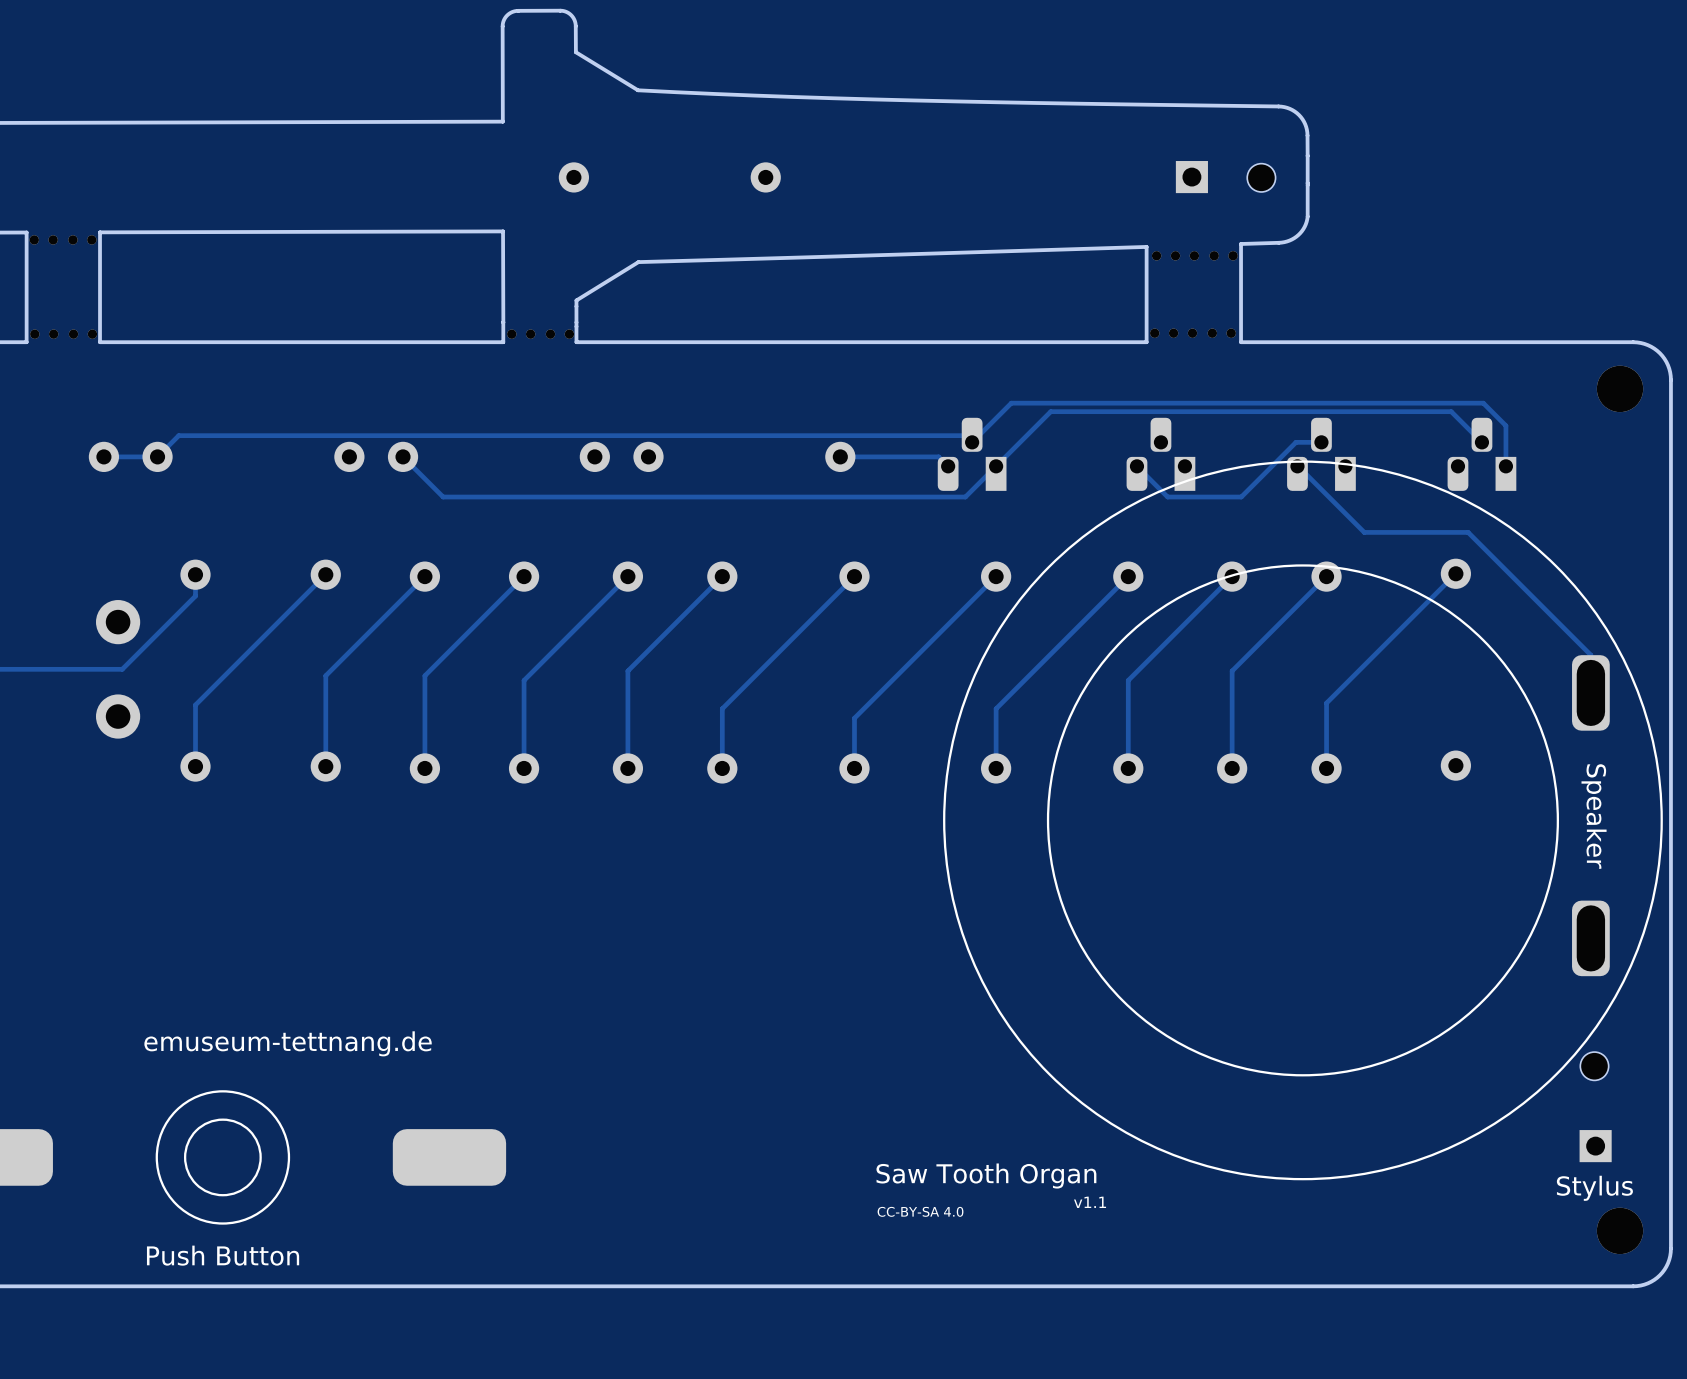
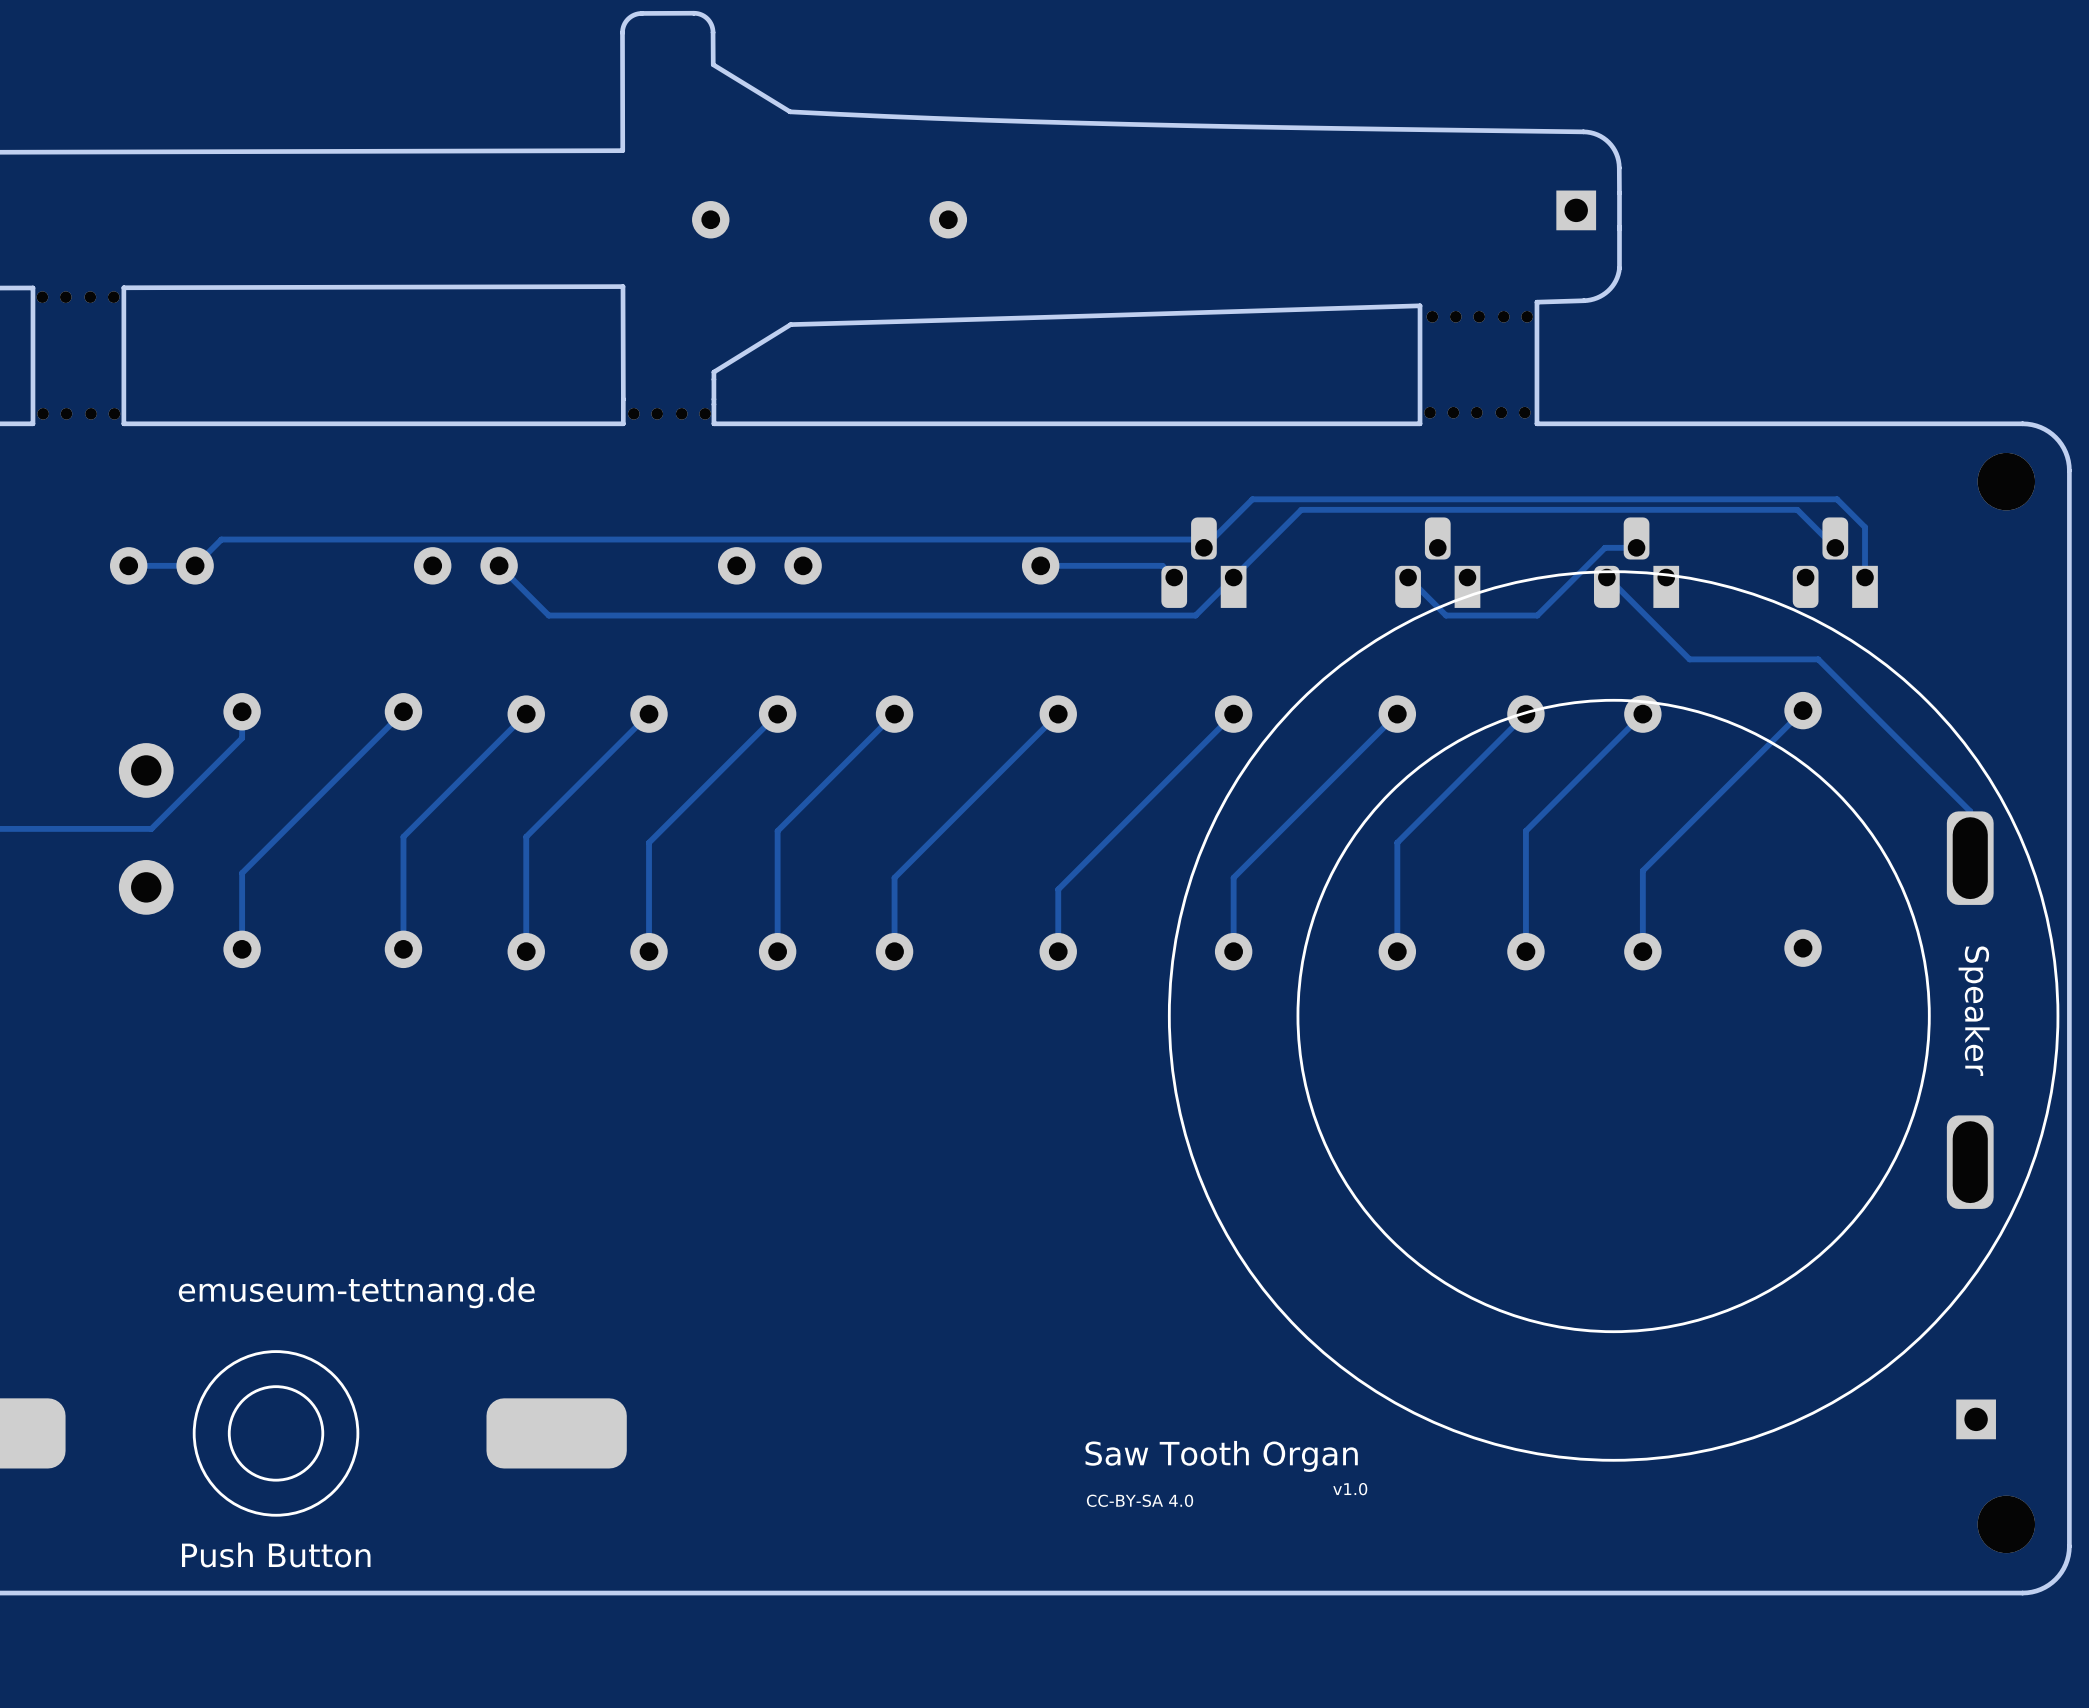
part footprint: [1247, 163, 1276, 192] -> [1556, 190, 1597, 231]
part: (1191, 177) -> none
part: (1594, 1066) -> none
text: Stylus (1594, 1188) -> none
text: v1.1 (1090, 1202) -> v1.0 (1350, 1489)

